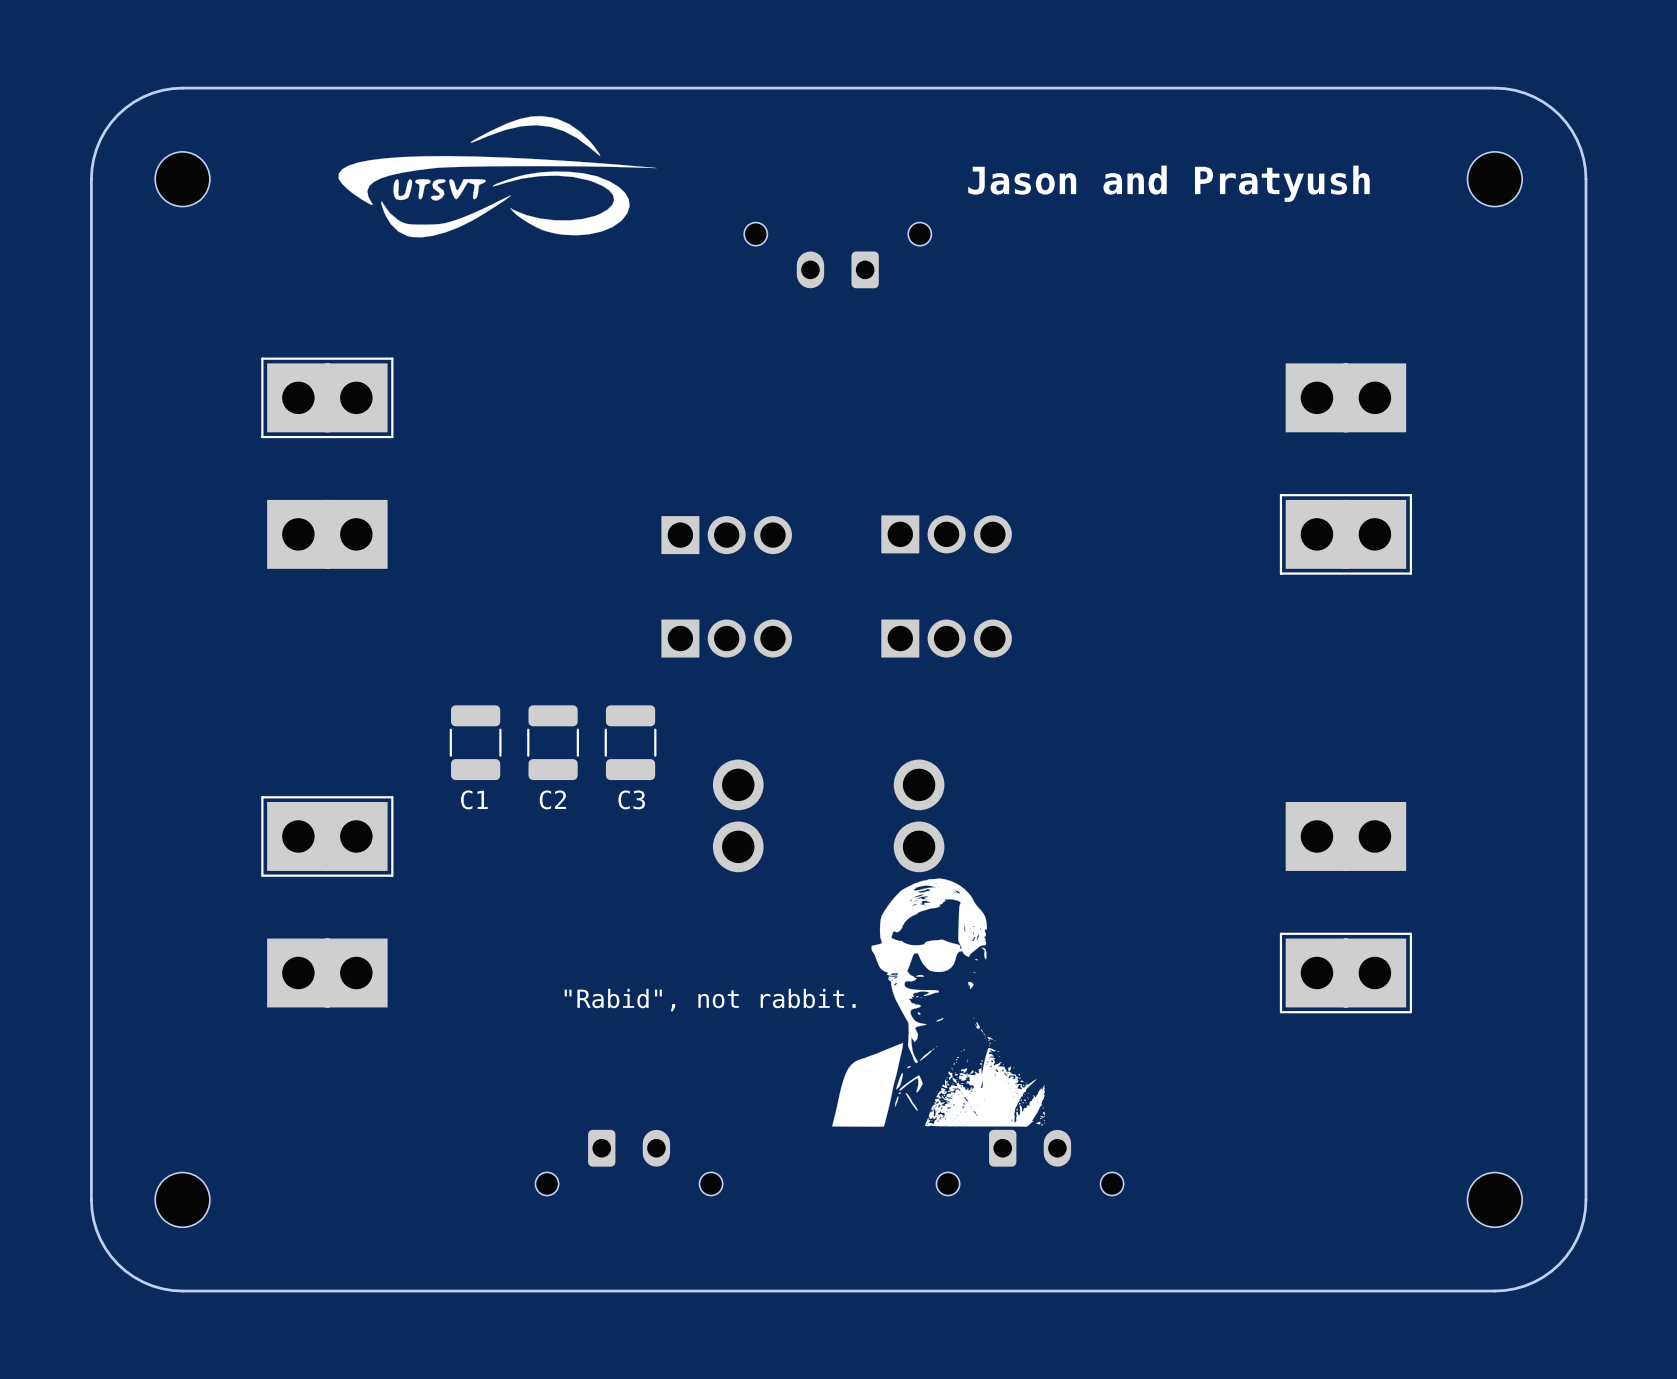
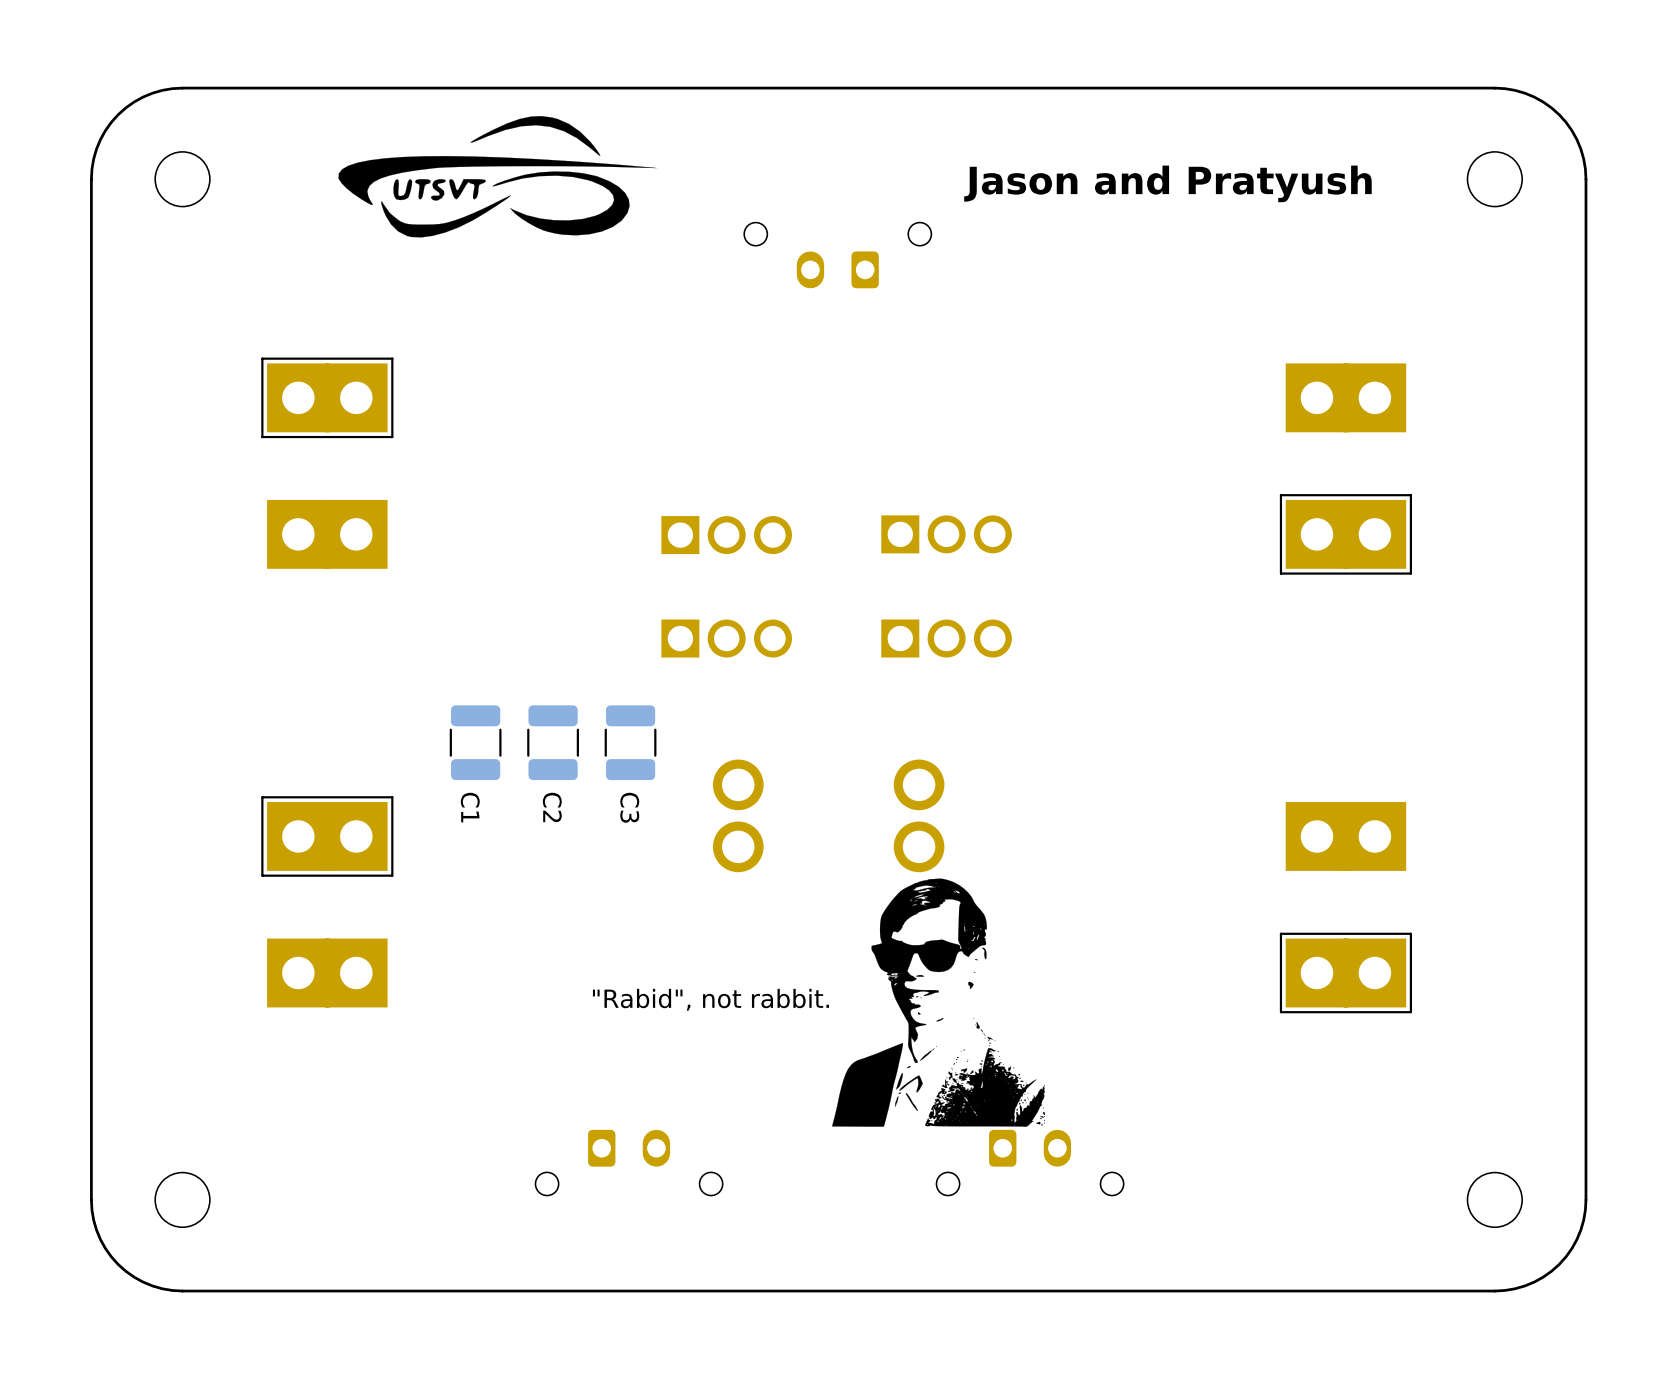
C1 name rotation: 0° (474, 799) -> 90° clockwise (470, 807)
C2 name rotation: 0° (552, 799) -> 90° clockwise (552, 807)
C3 name rotation: 0° (631, 799) -> 90° clockwise (629, 807)

